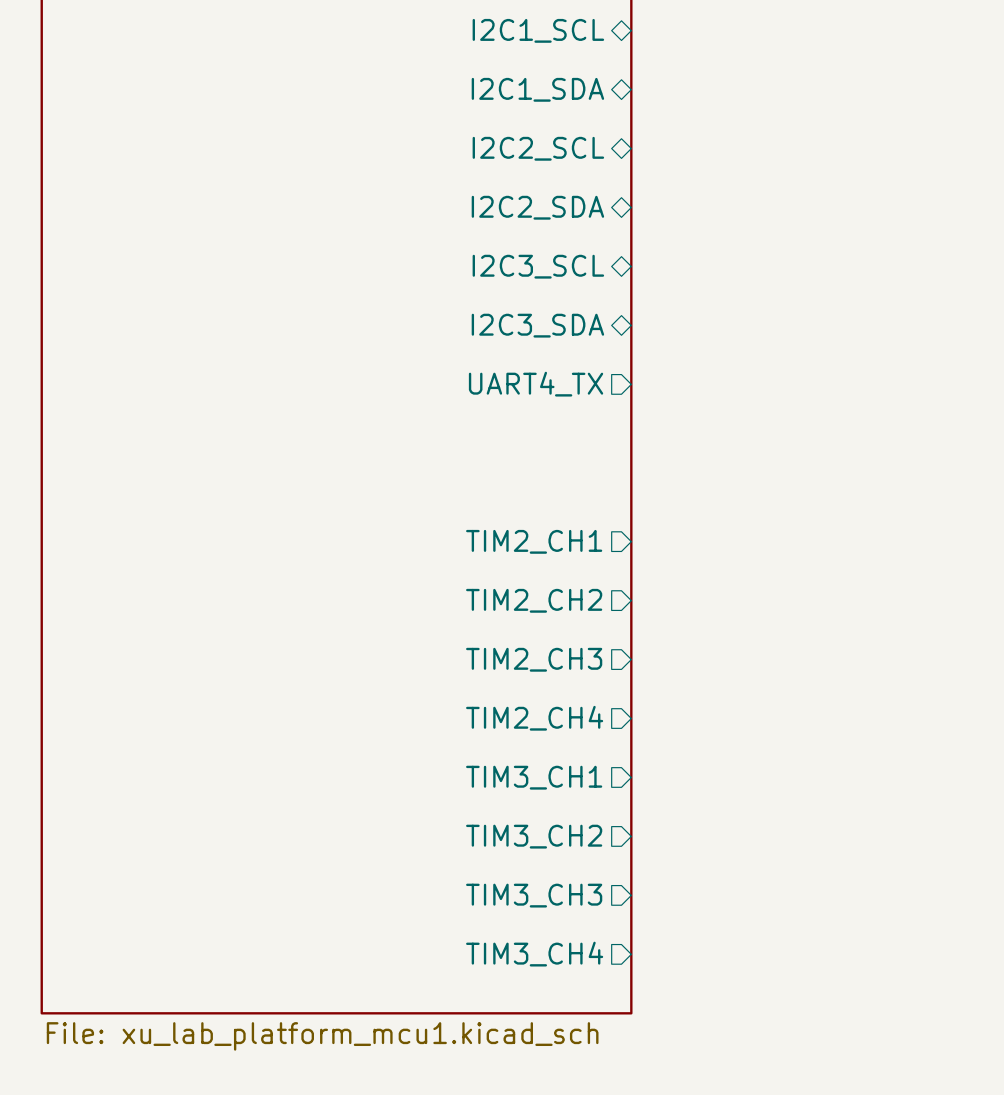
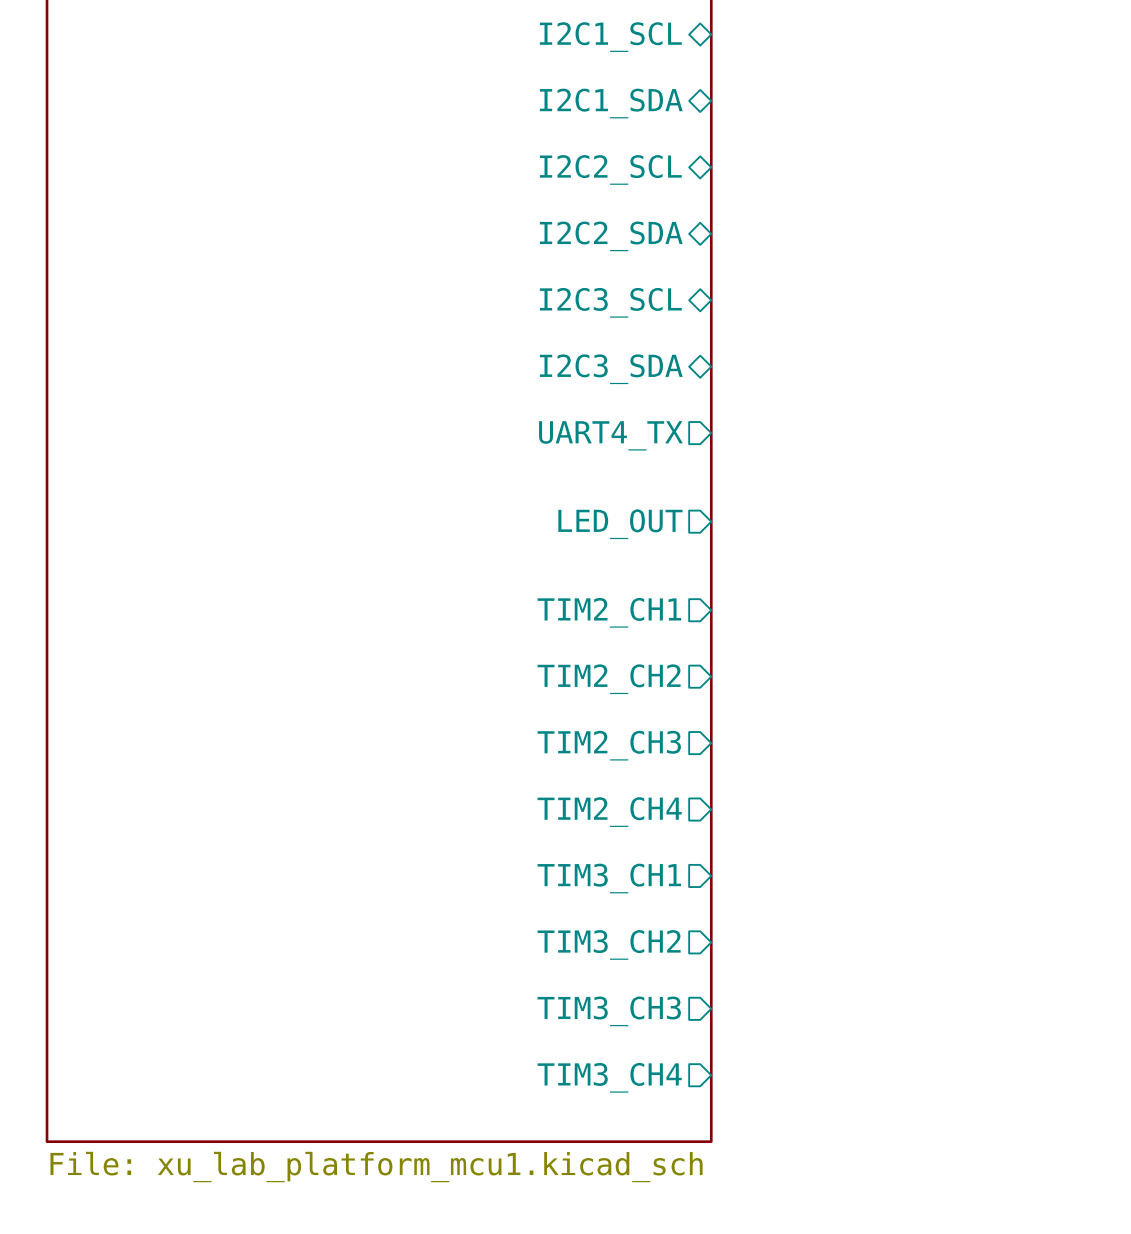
sheet pin: none -> LED_OUT (620, 524)

